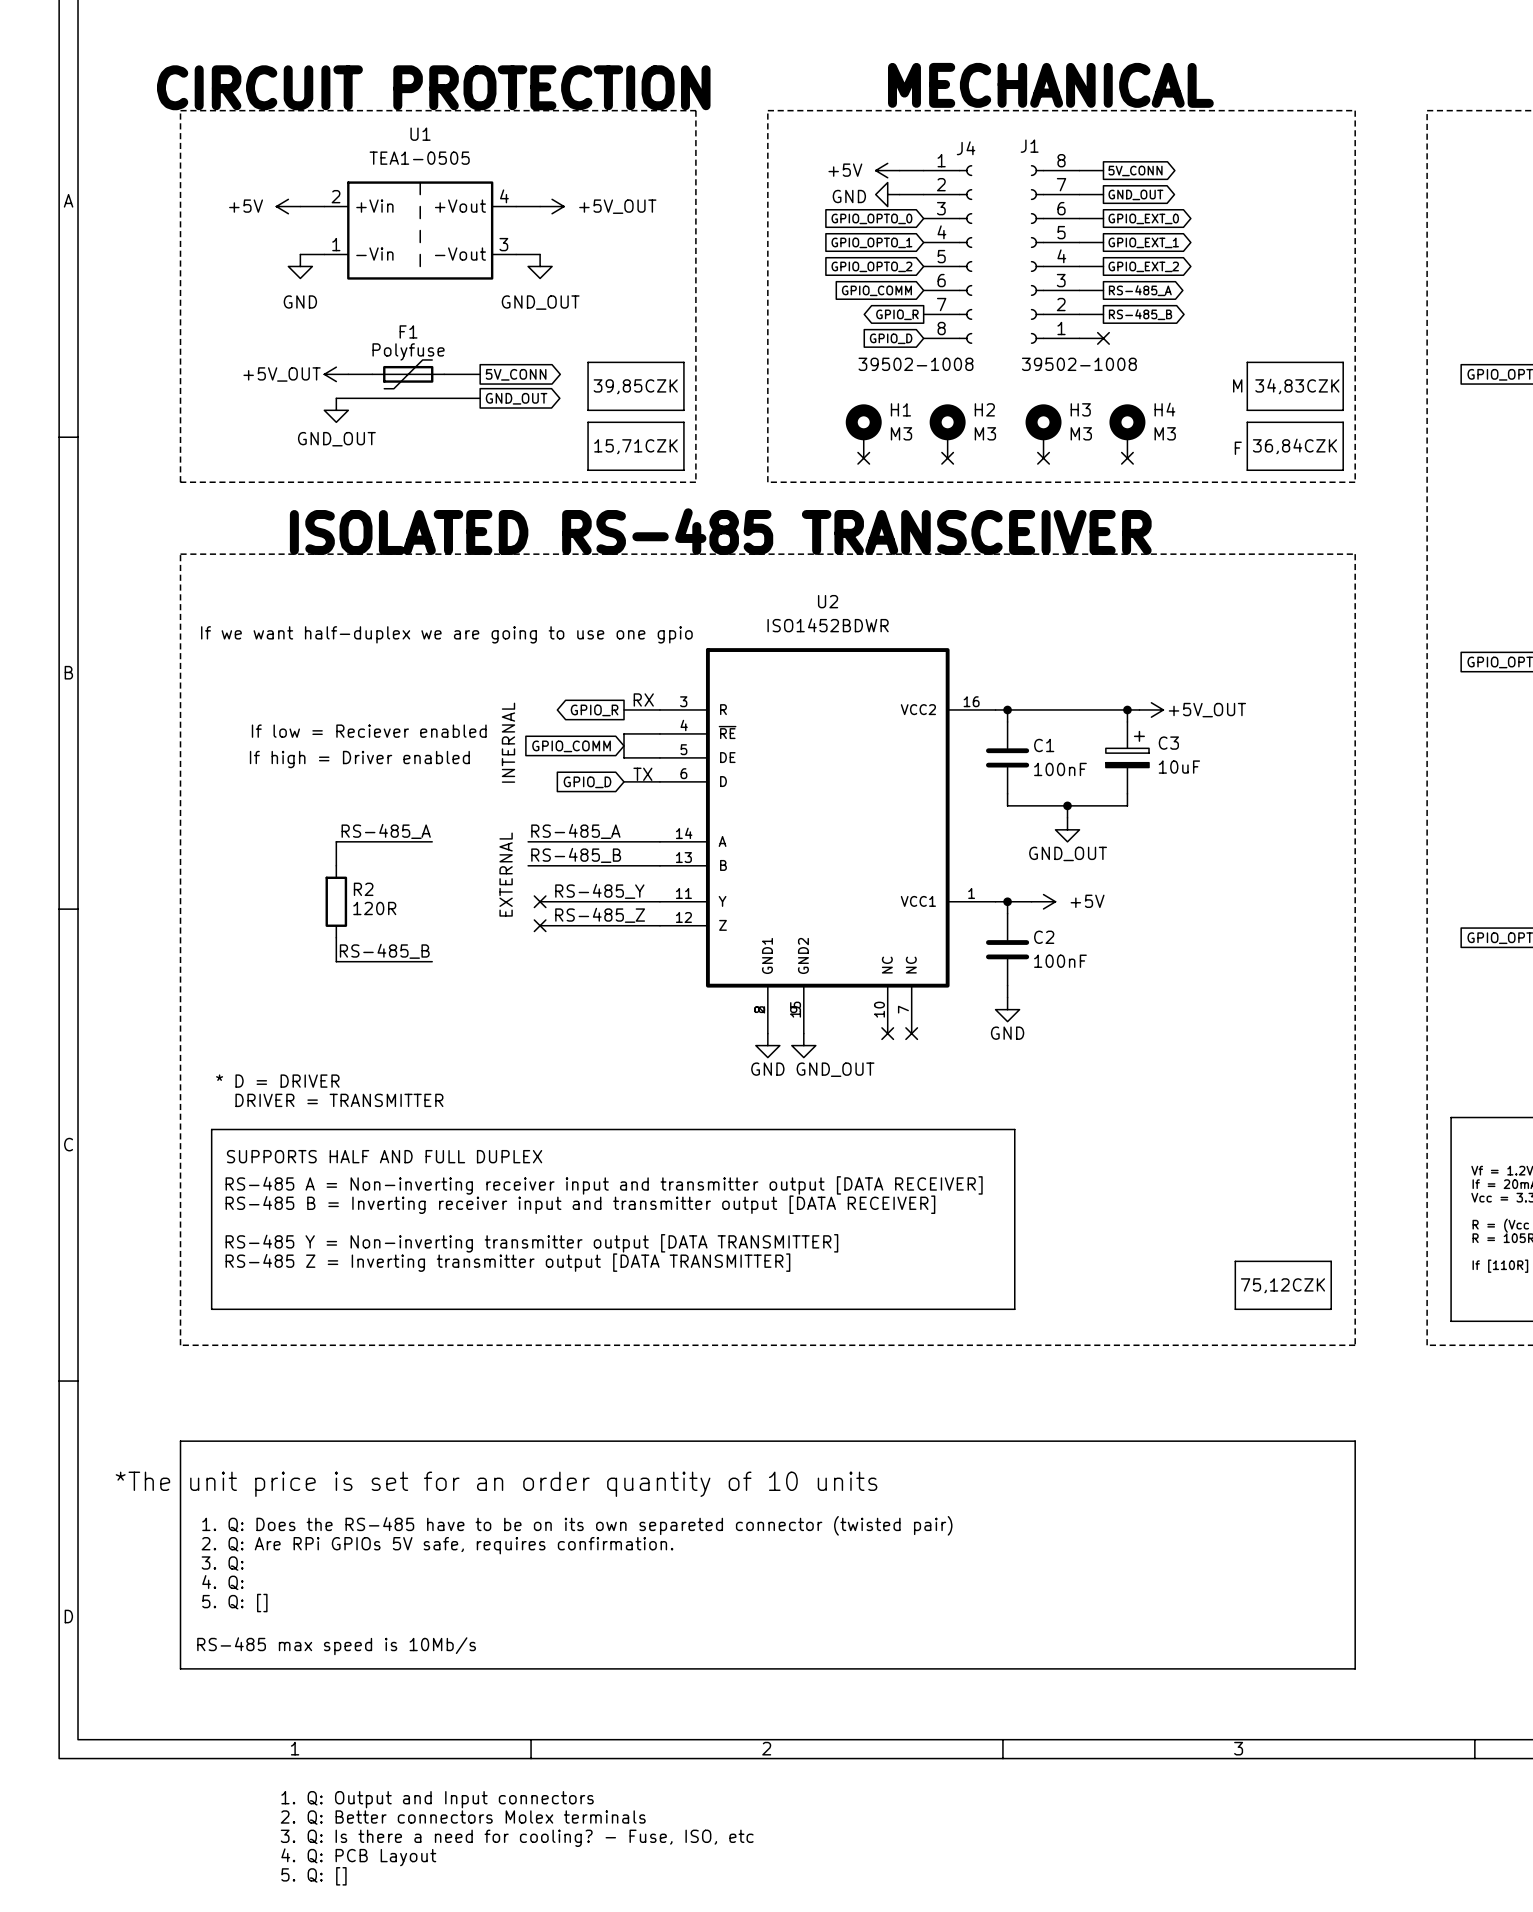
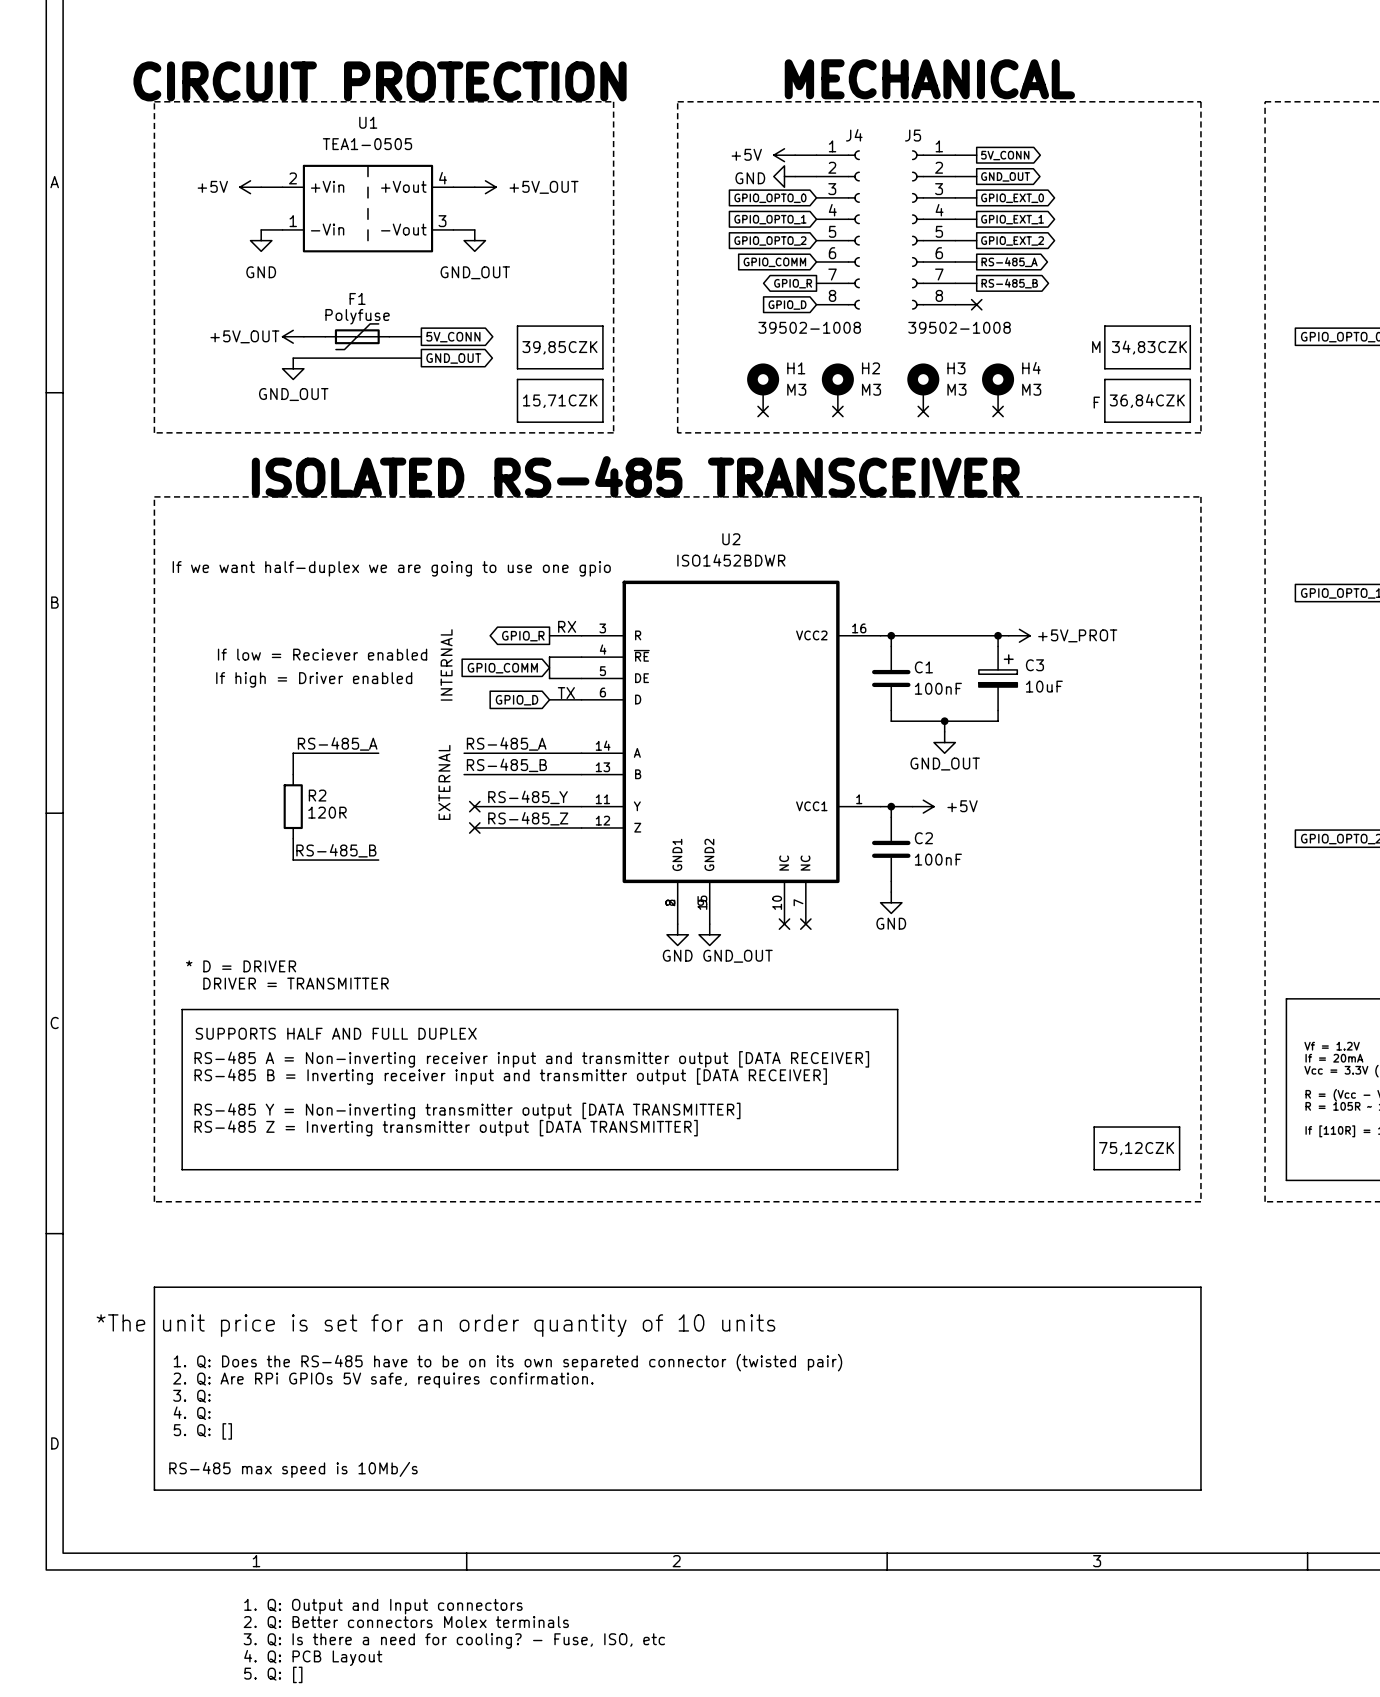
J1 name: J1 (1029, 146) -> J5 (913, 135)
J1 flip: as is (1037, 254) -> up-down (917, 229)
power symbol: +5V_OUT (1151, 709) -> +5V_PROT (1019, 635)

